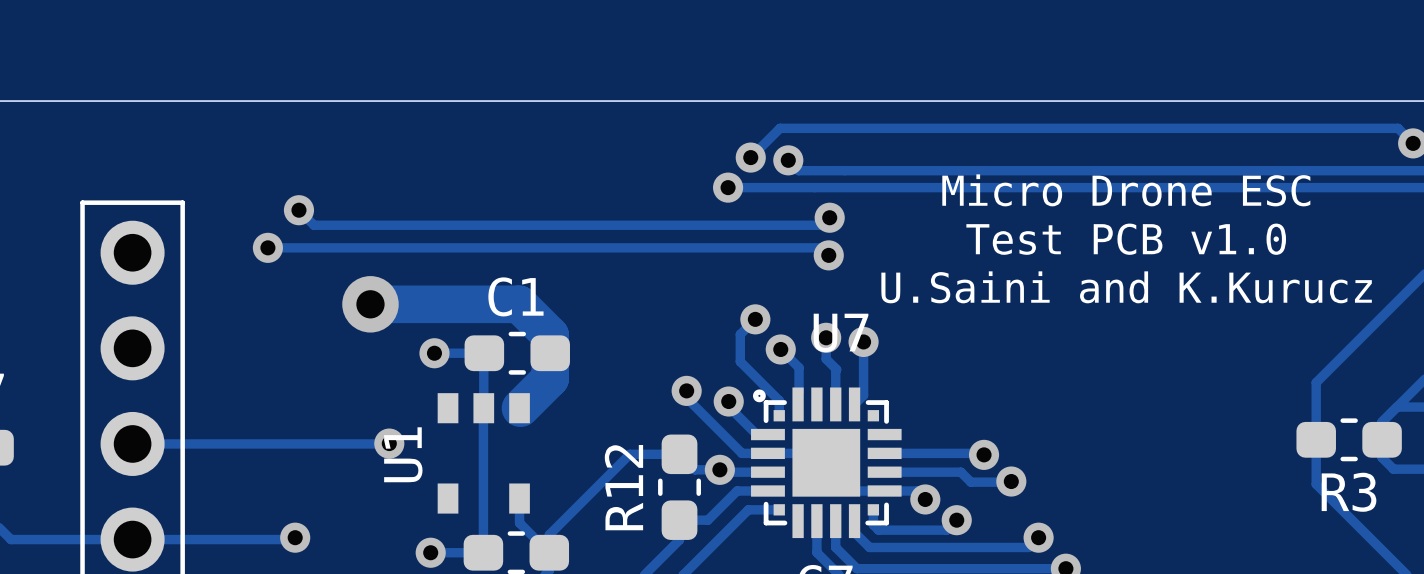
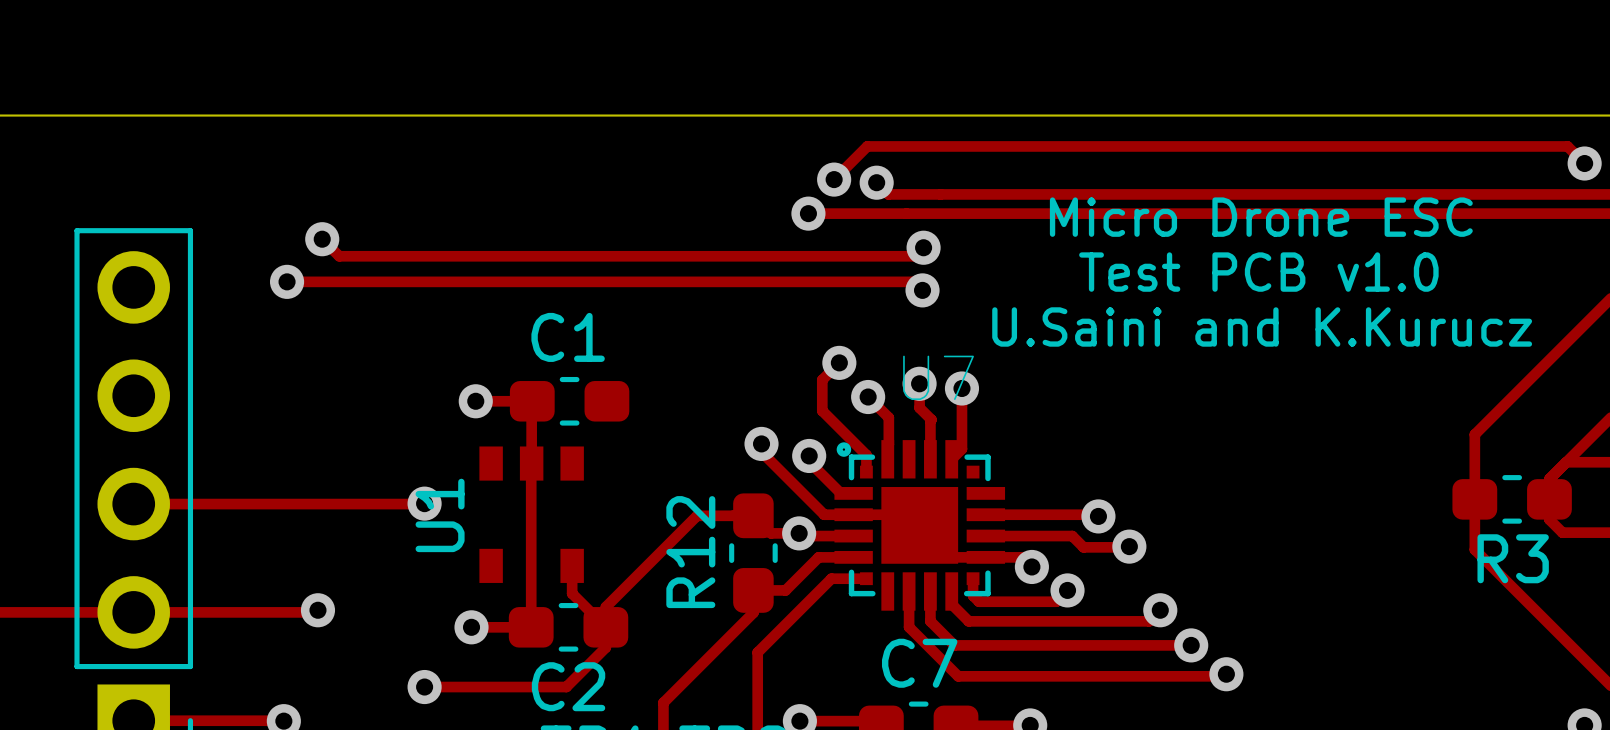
track: (370, 304) (519, 304) (550, 335) (550, 378) (520, 408) -> none
via: (370, 304) -> none

